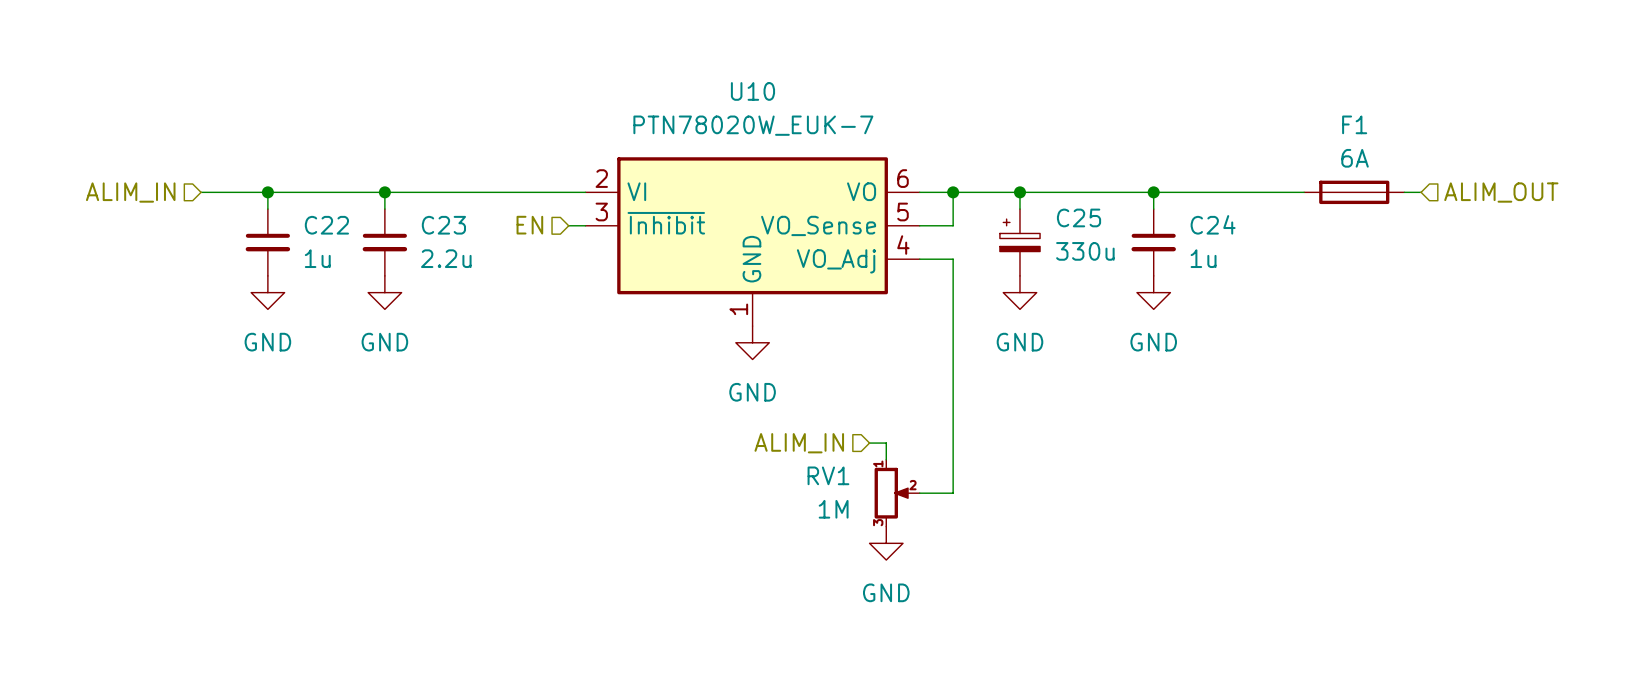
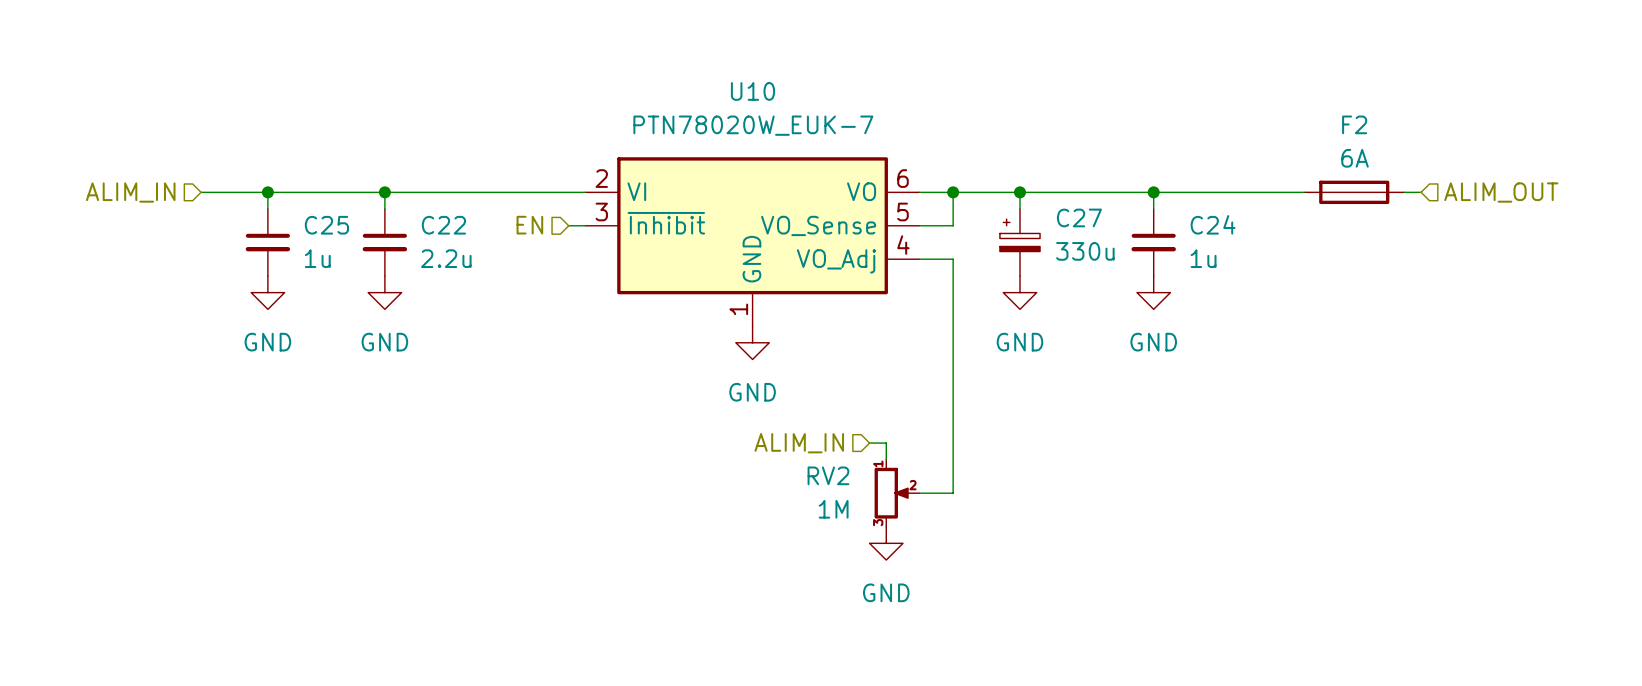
F1 name: F1 (1354, 124) -> F2 (1354, 124)
C25 name: C25 (1079, 217) -> C27 (1079, 217)
C22 name: C22 (326, 225) -> C25 (326, 225)
C23 name: C23 (443, 225) -> C22 (443, 225)
RV1 name: RV1 (828, 475) -> RV2 (828, 475)

